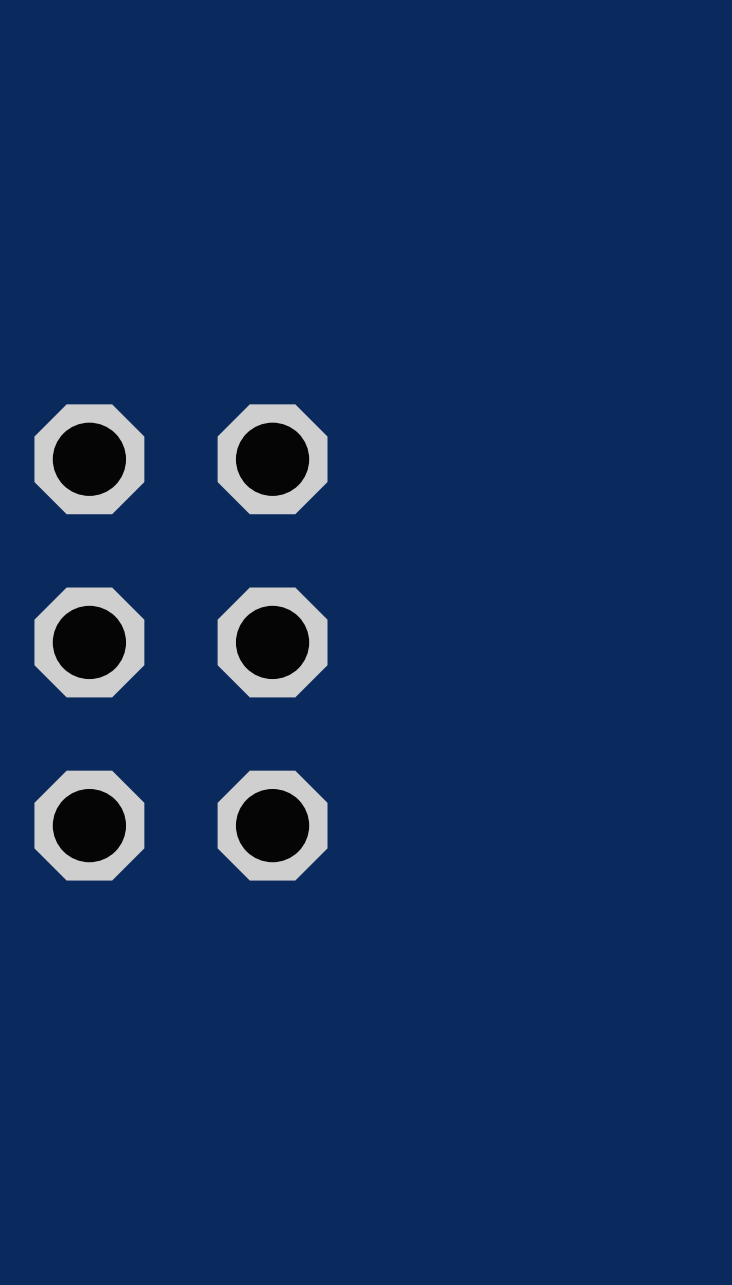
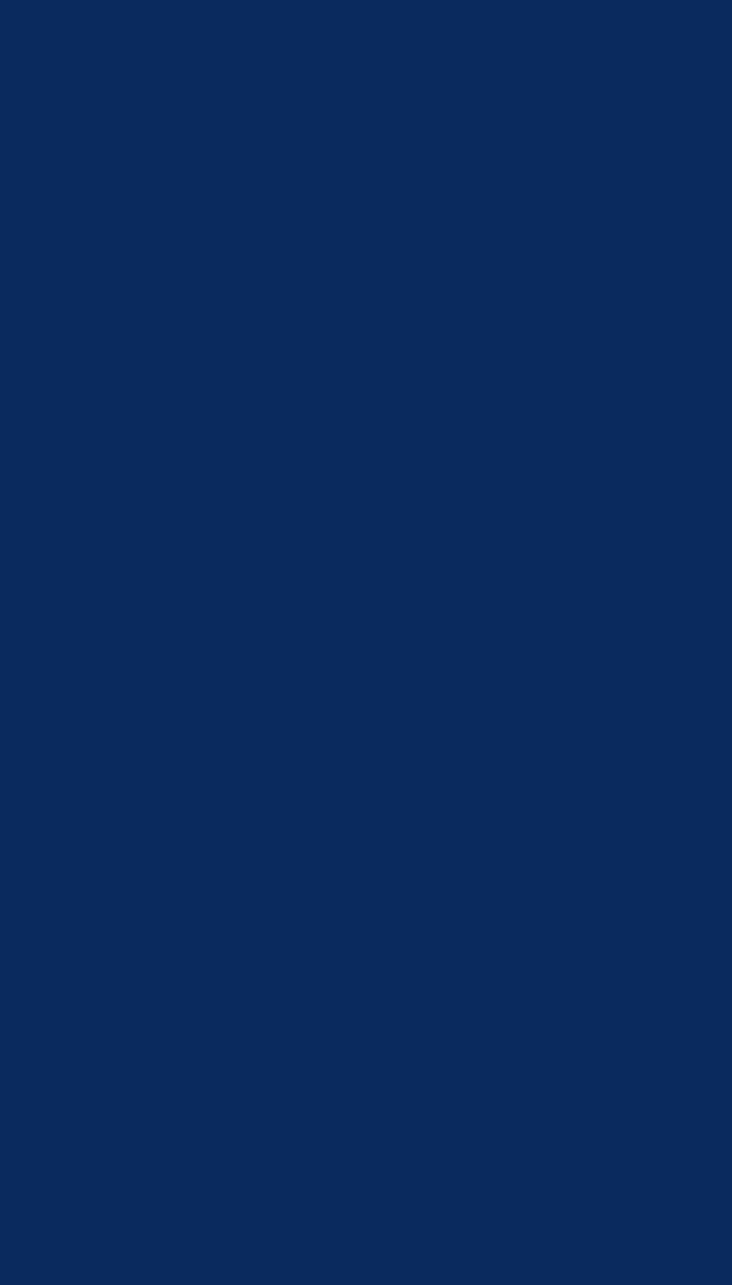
part: (180, 642) -> none

